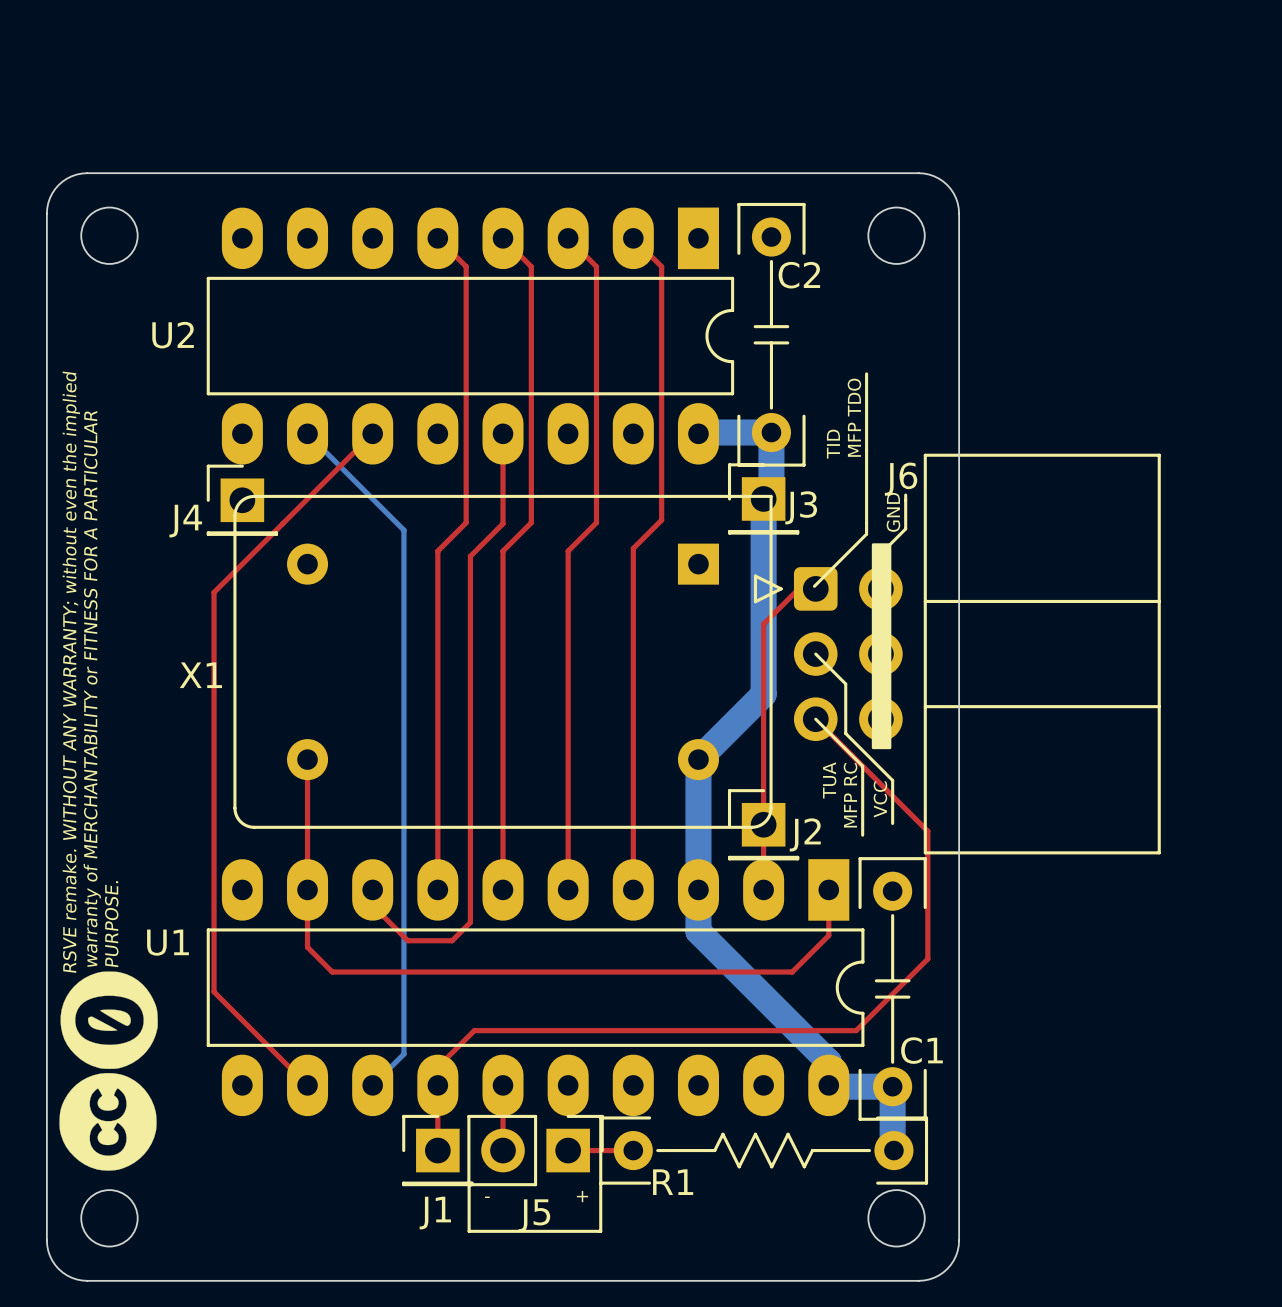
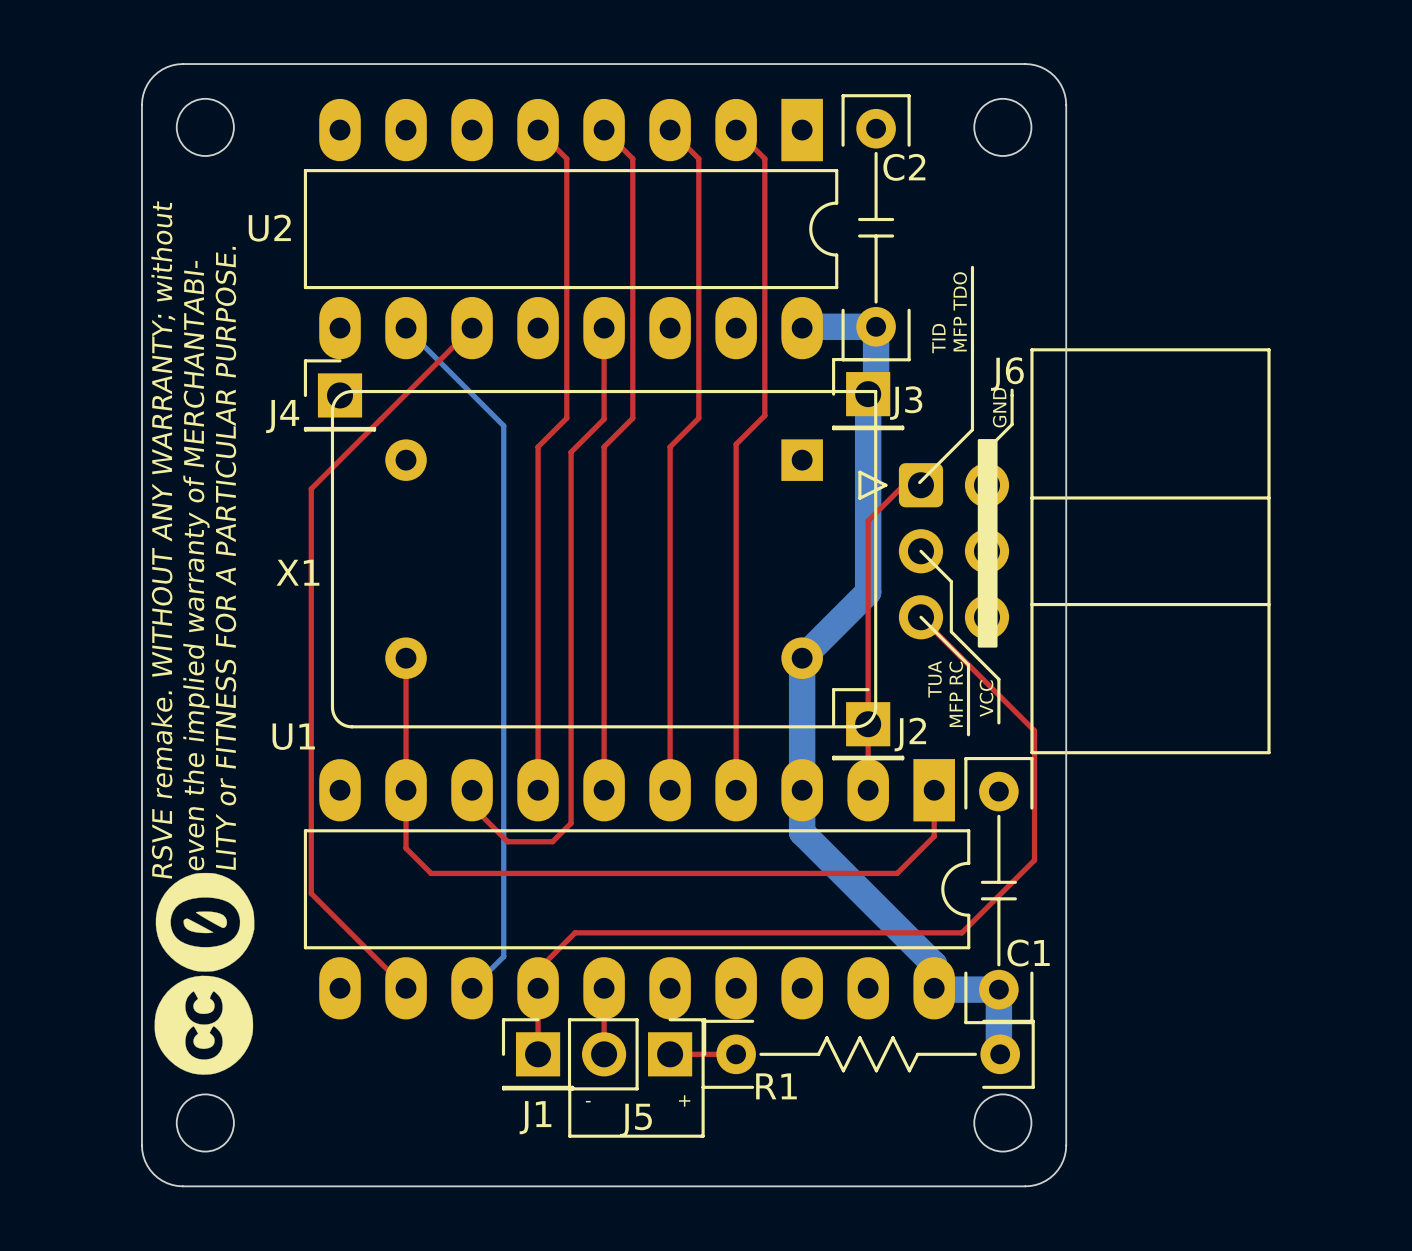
text: none -> LITY or FITNESS FOR A PARTICULAR PURPOSE. (225, 558)
text: none -> even the implied warranty of MERCHANTABI- (196, 565)
text: RSVE remake. WITHOUT ANY WARRANTY; without even the implied (71, 672) -> RSVE remake. WITHOUT ANY WARRANTY; without (163, 539)
text: warranty of MERCHANTABILITY or FITNESS FOR A PARTICULAR (92, 688) -> none
text: PURPOSE. (111, 924) -> none
U1 name position: U1 (168, 942) -> U1 (293, 736)

